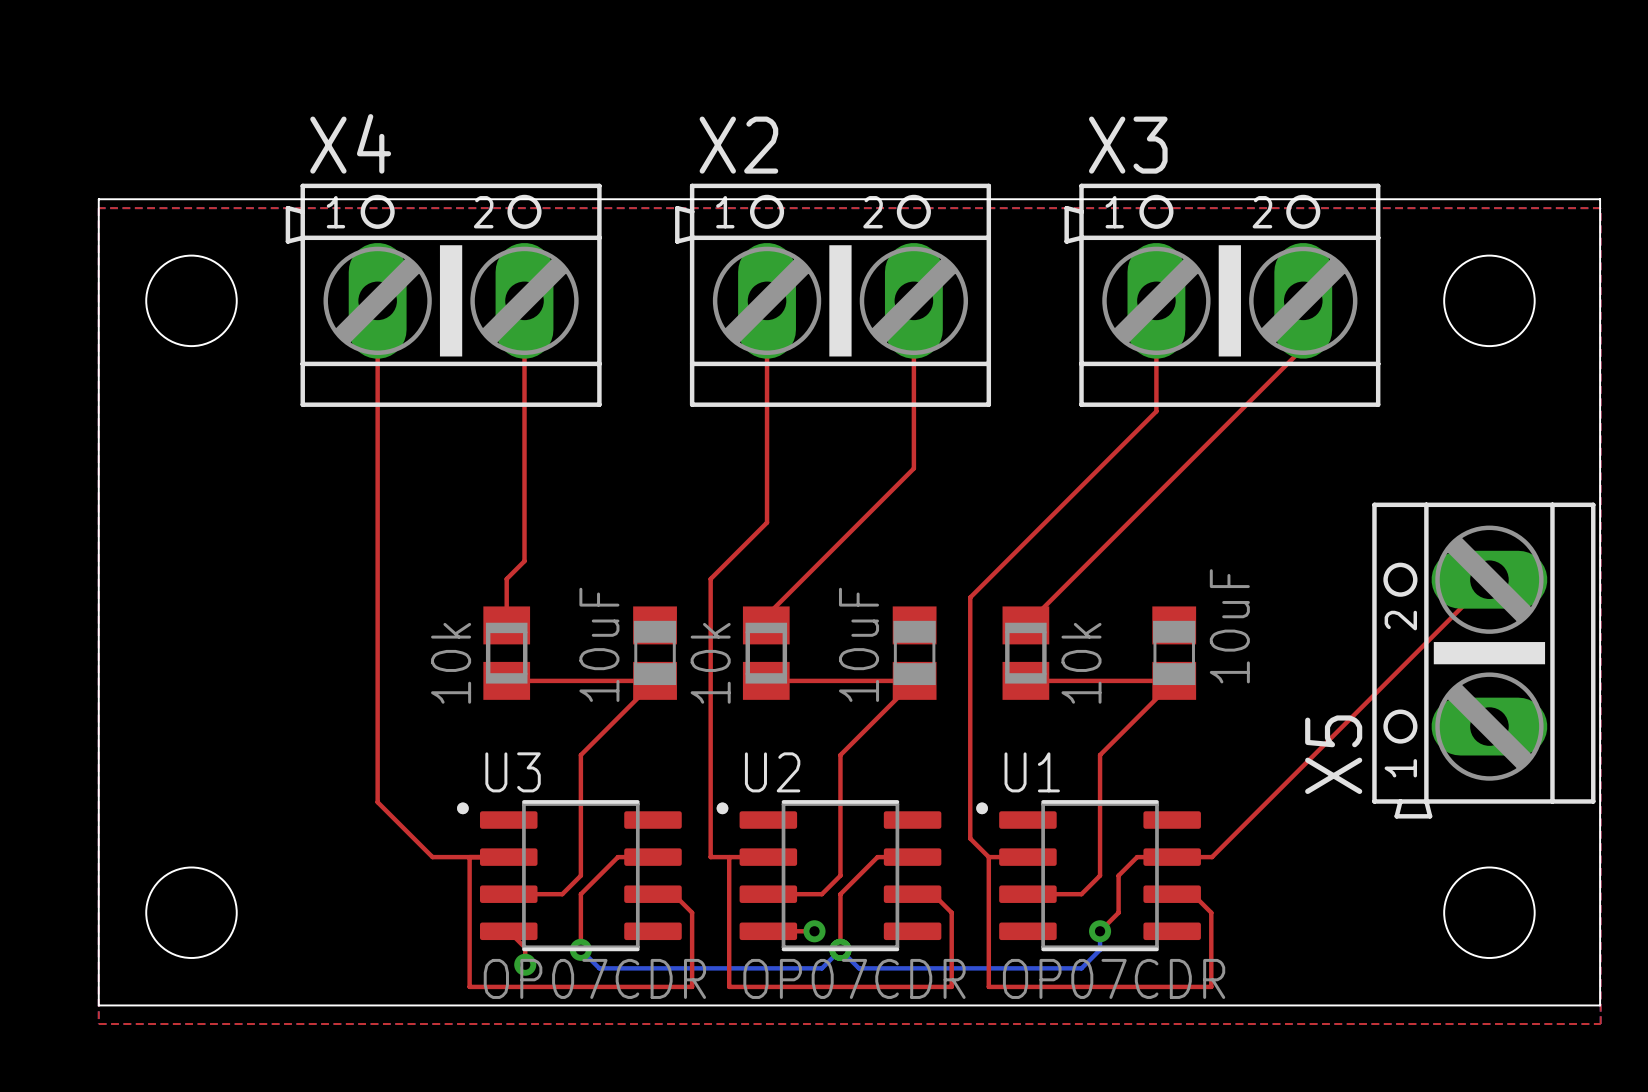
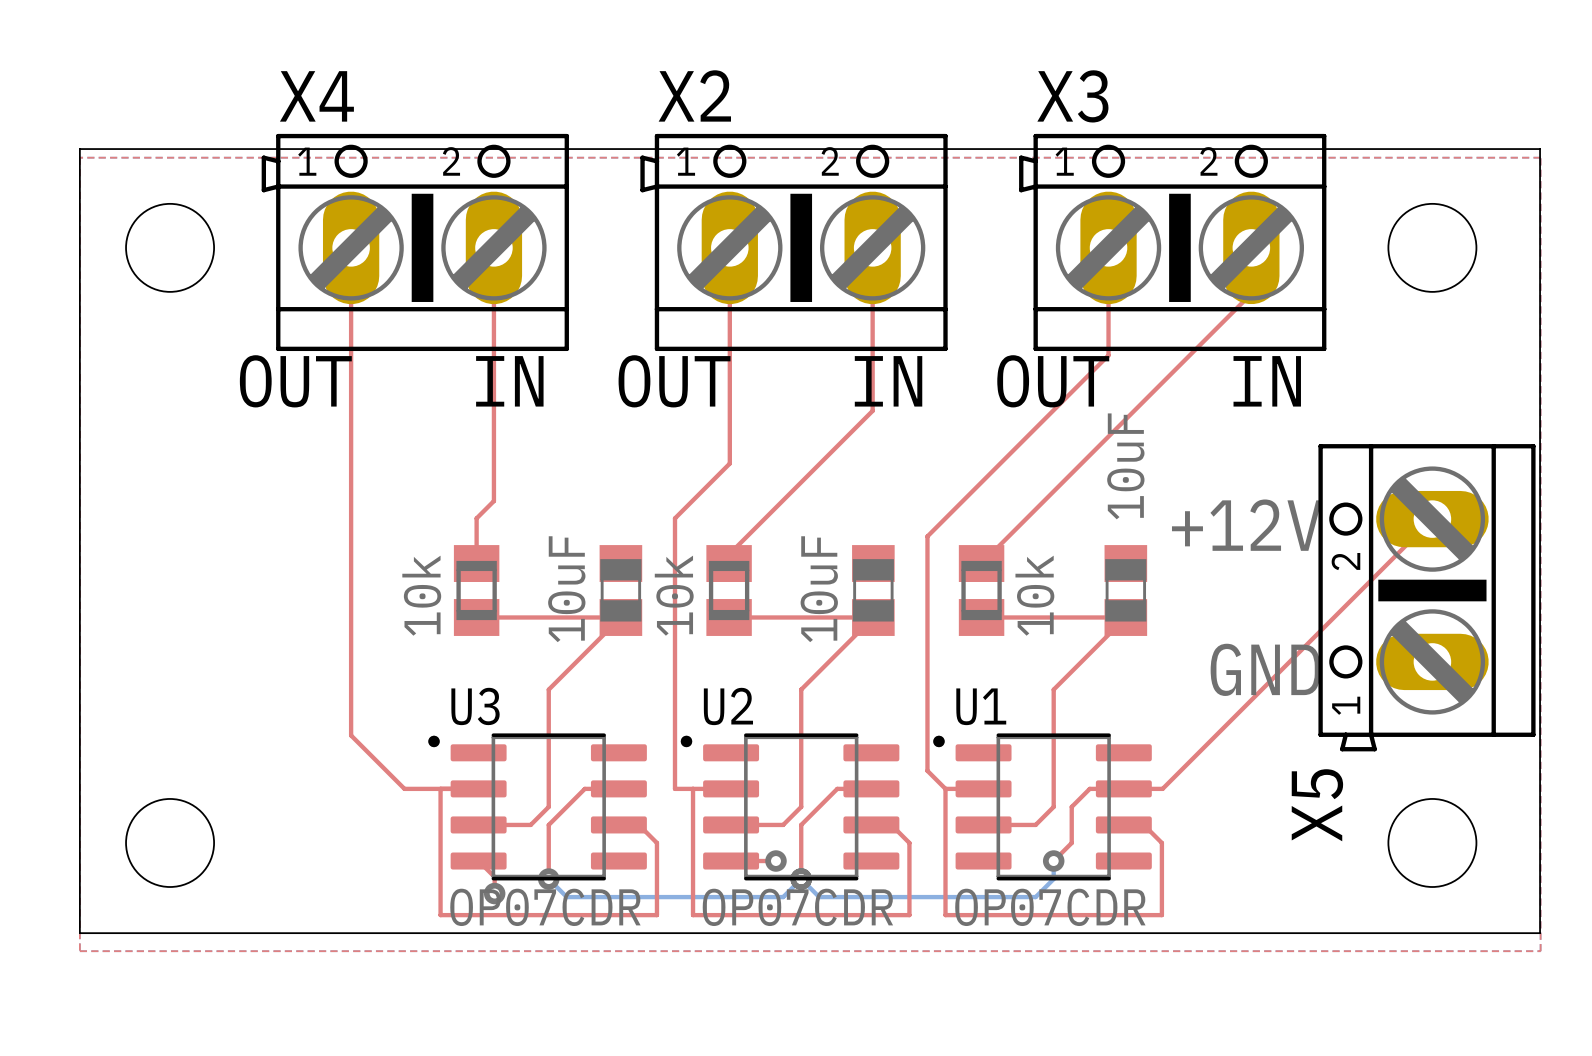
text: none -> OUT IN (391, 381)
text: none -> OUT IN (770, 381)
text: none -> OUT IN (1149, 381)
text: none -> +12V (1246, 525)
part value position: 10uF (1229, 626) -> 10uF (1125, 466)
text: none -> GND (1265, 669)
X5 name position: X5 (1333, 754) -> X5 (1317, 805)

